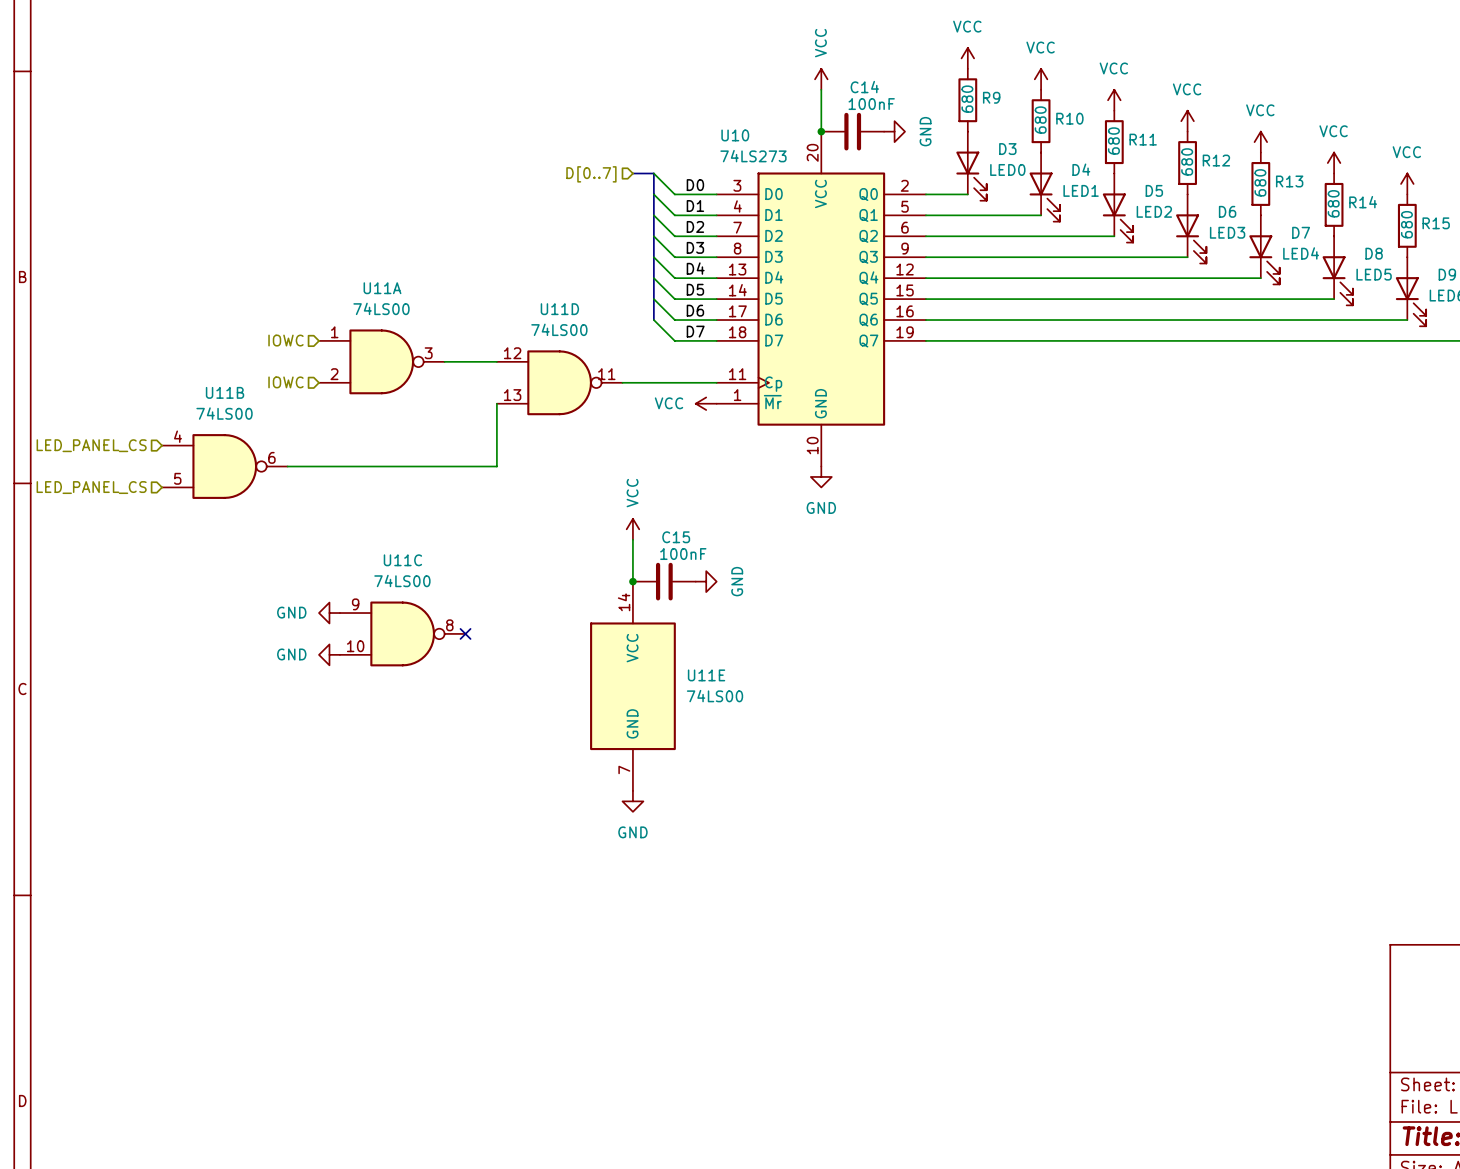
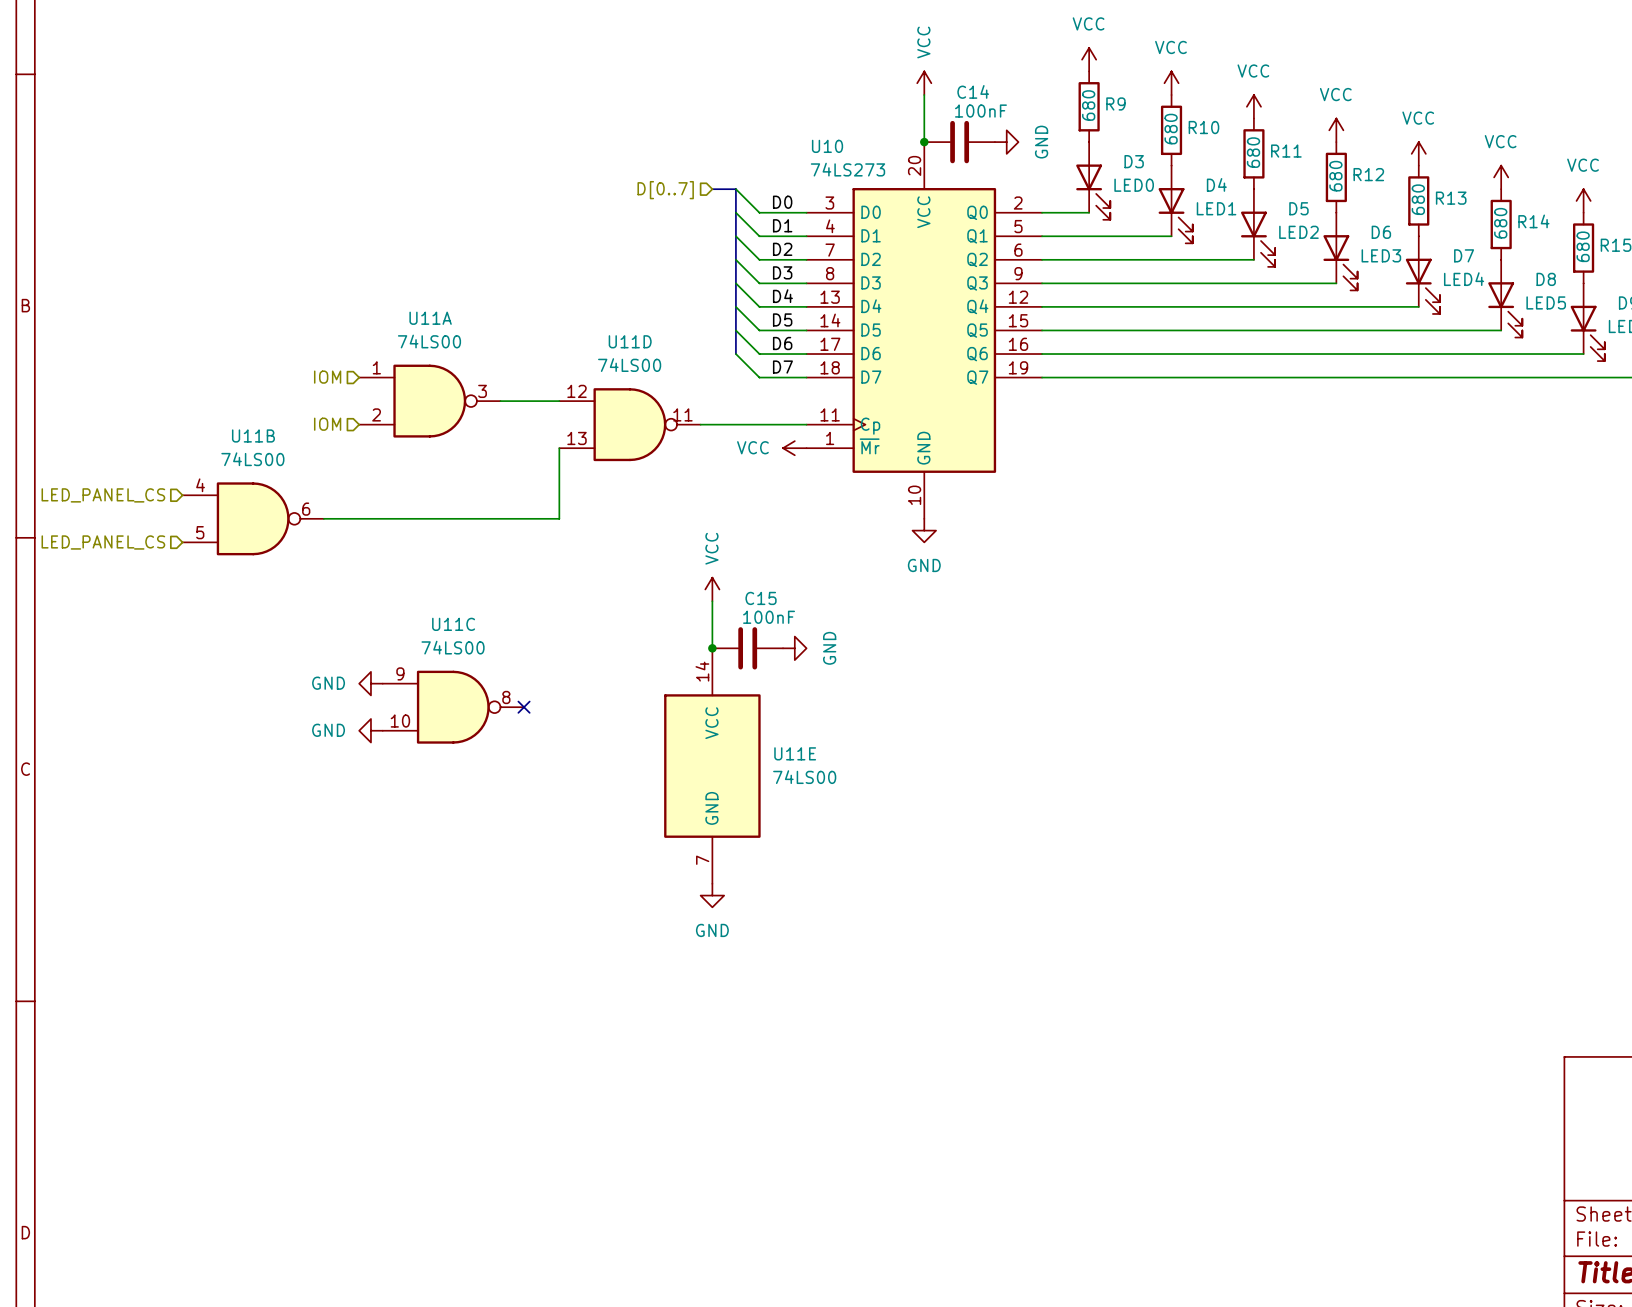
hierarchical label: IOWC (285, 340) -> IOM (327, 377)
hierarchical label: IOWC (285, 382) -> IOM (327, 424)

